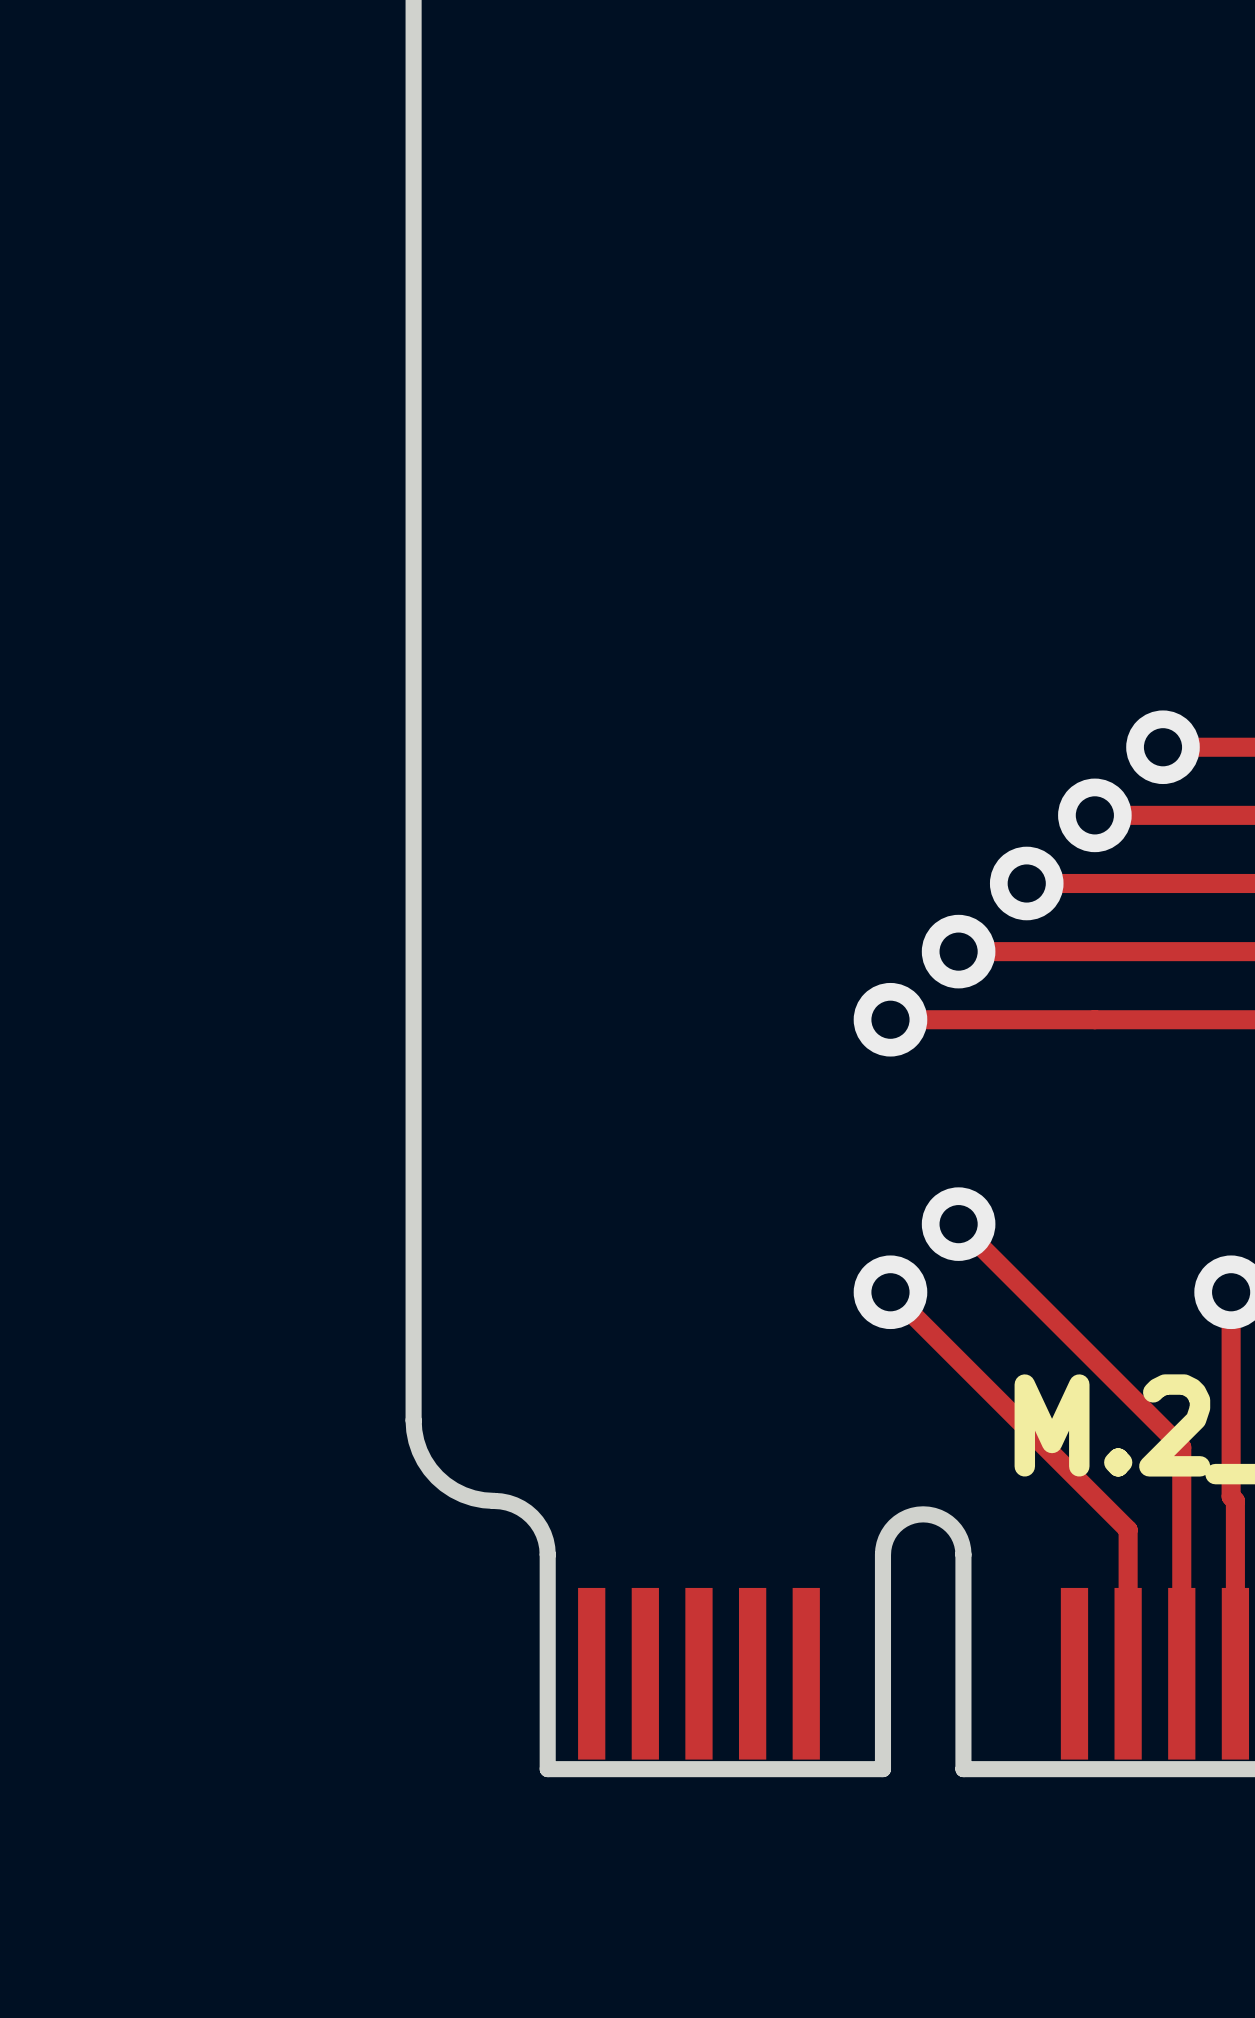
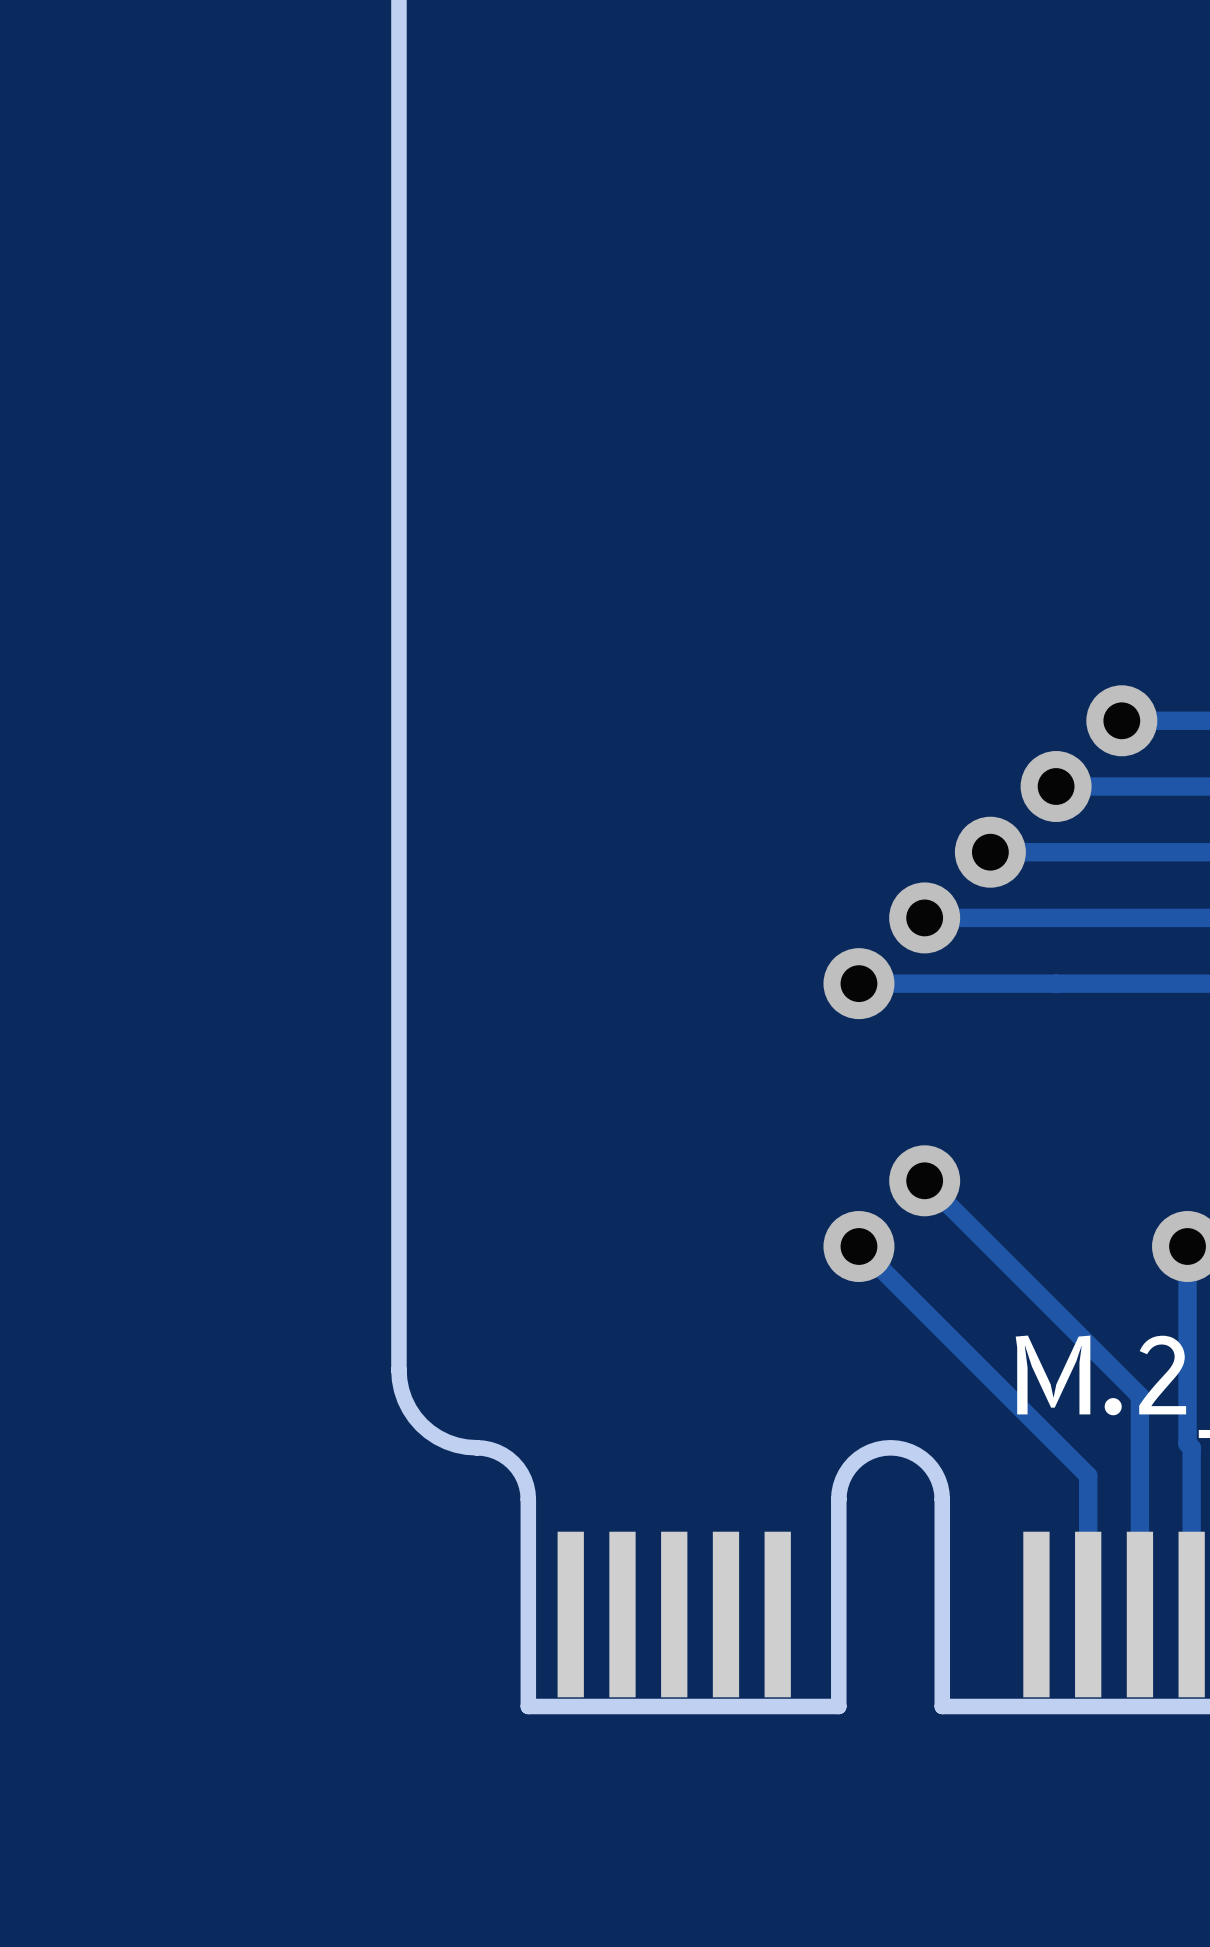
board edge: (869, 1769) (882, 1769) (884, 1544) (888, 1534) (898, 1522) (912, 1515) (923, 1514) (933, 1515) (947, 1522) (958, 1534) (962, 1544) (963, 1769) (976, 1769) -> (838, 1706) (838, 1499) (840, 1486) (849, 1468) (859, 1458) (877, 1449) (890, 1447) (903, 1449) (922, 1458) (931, 1468) (940, 1486) (942, 1499) (942, 1706)

